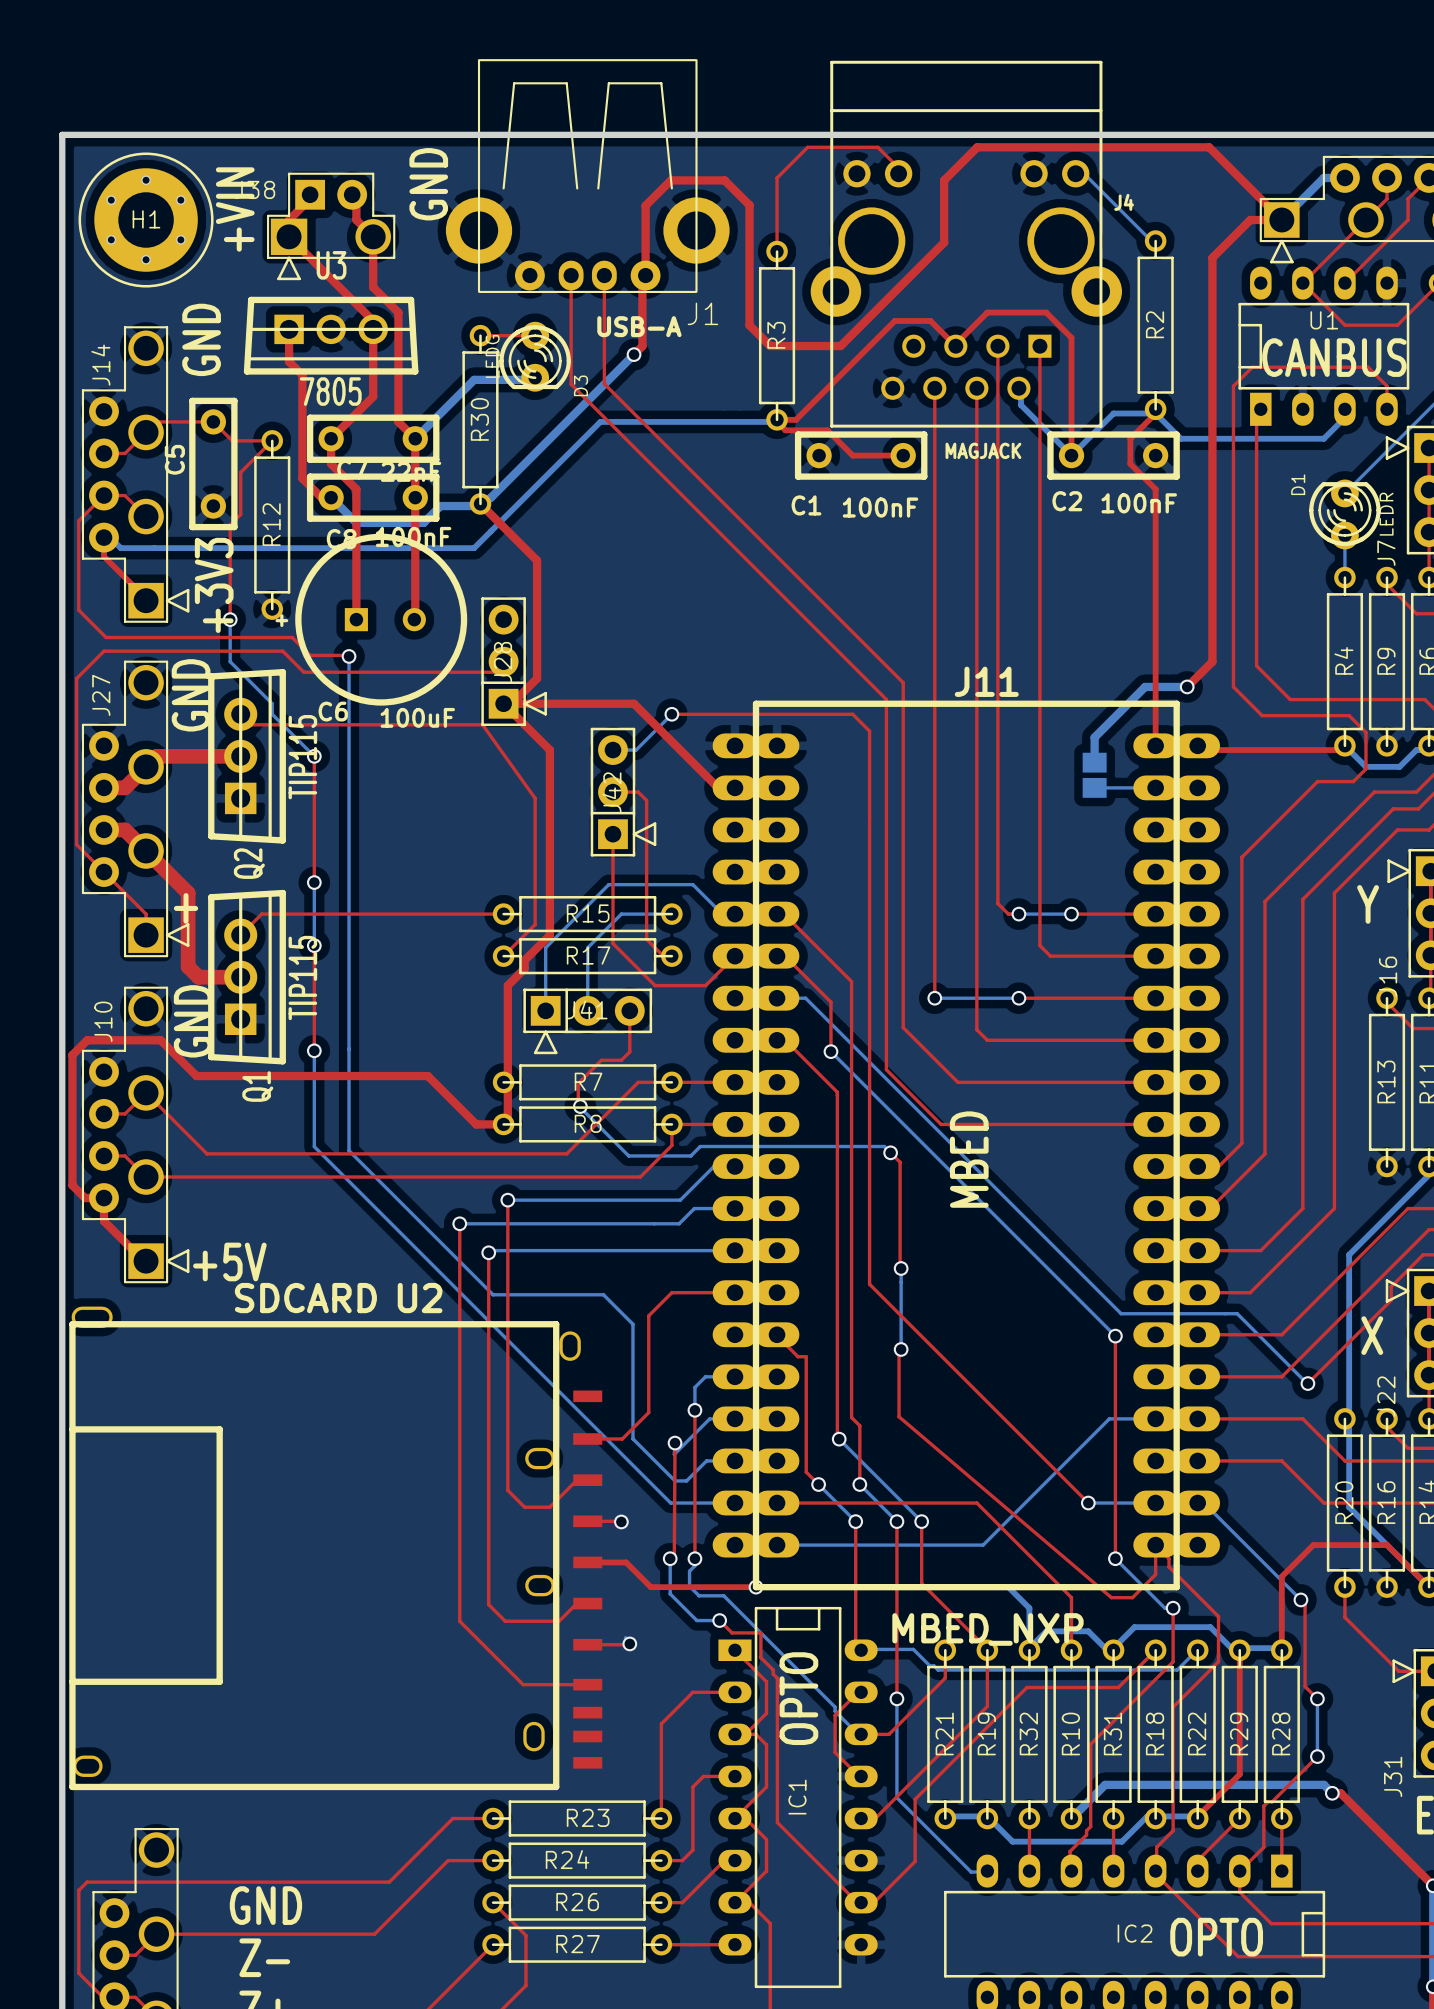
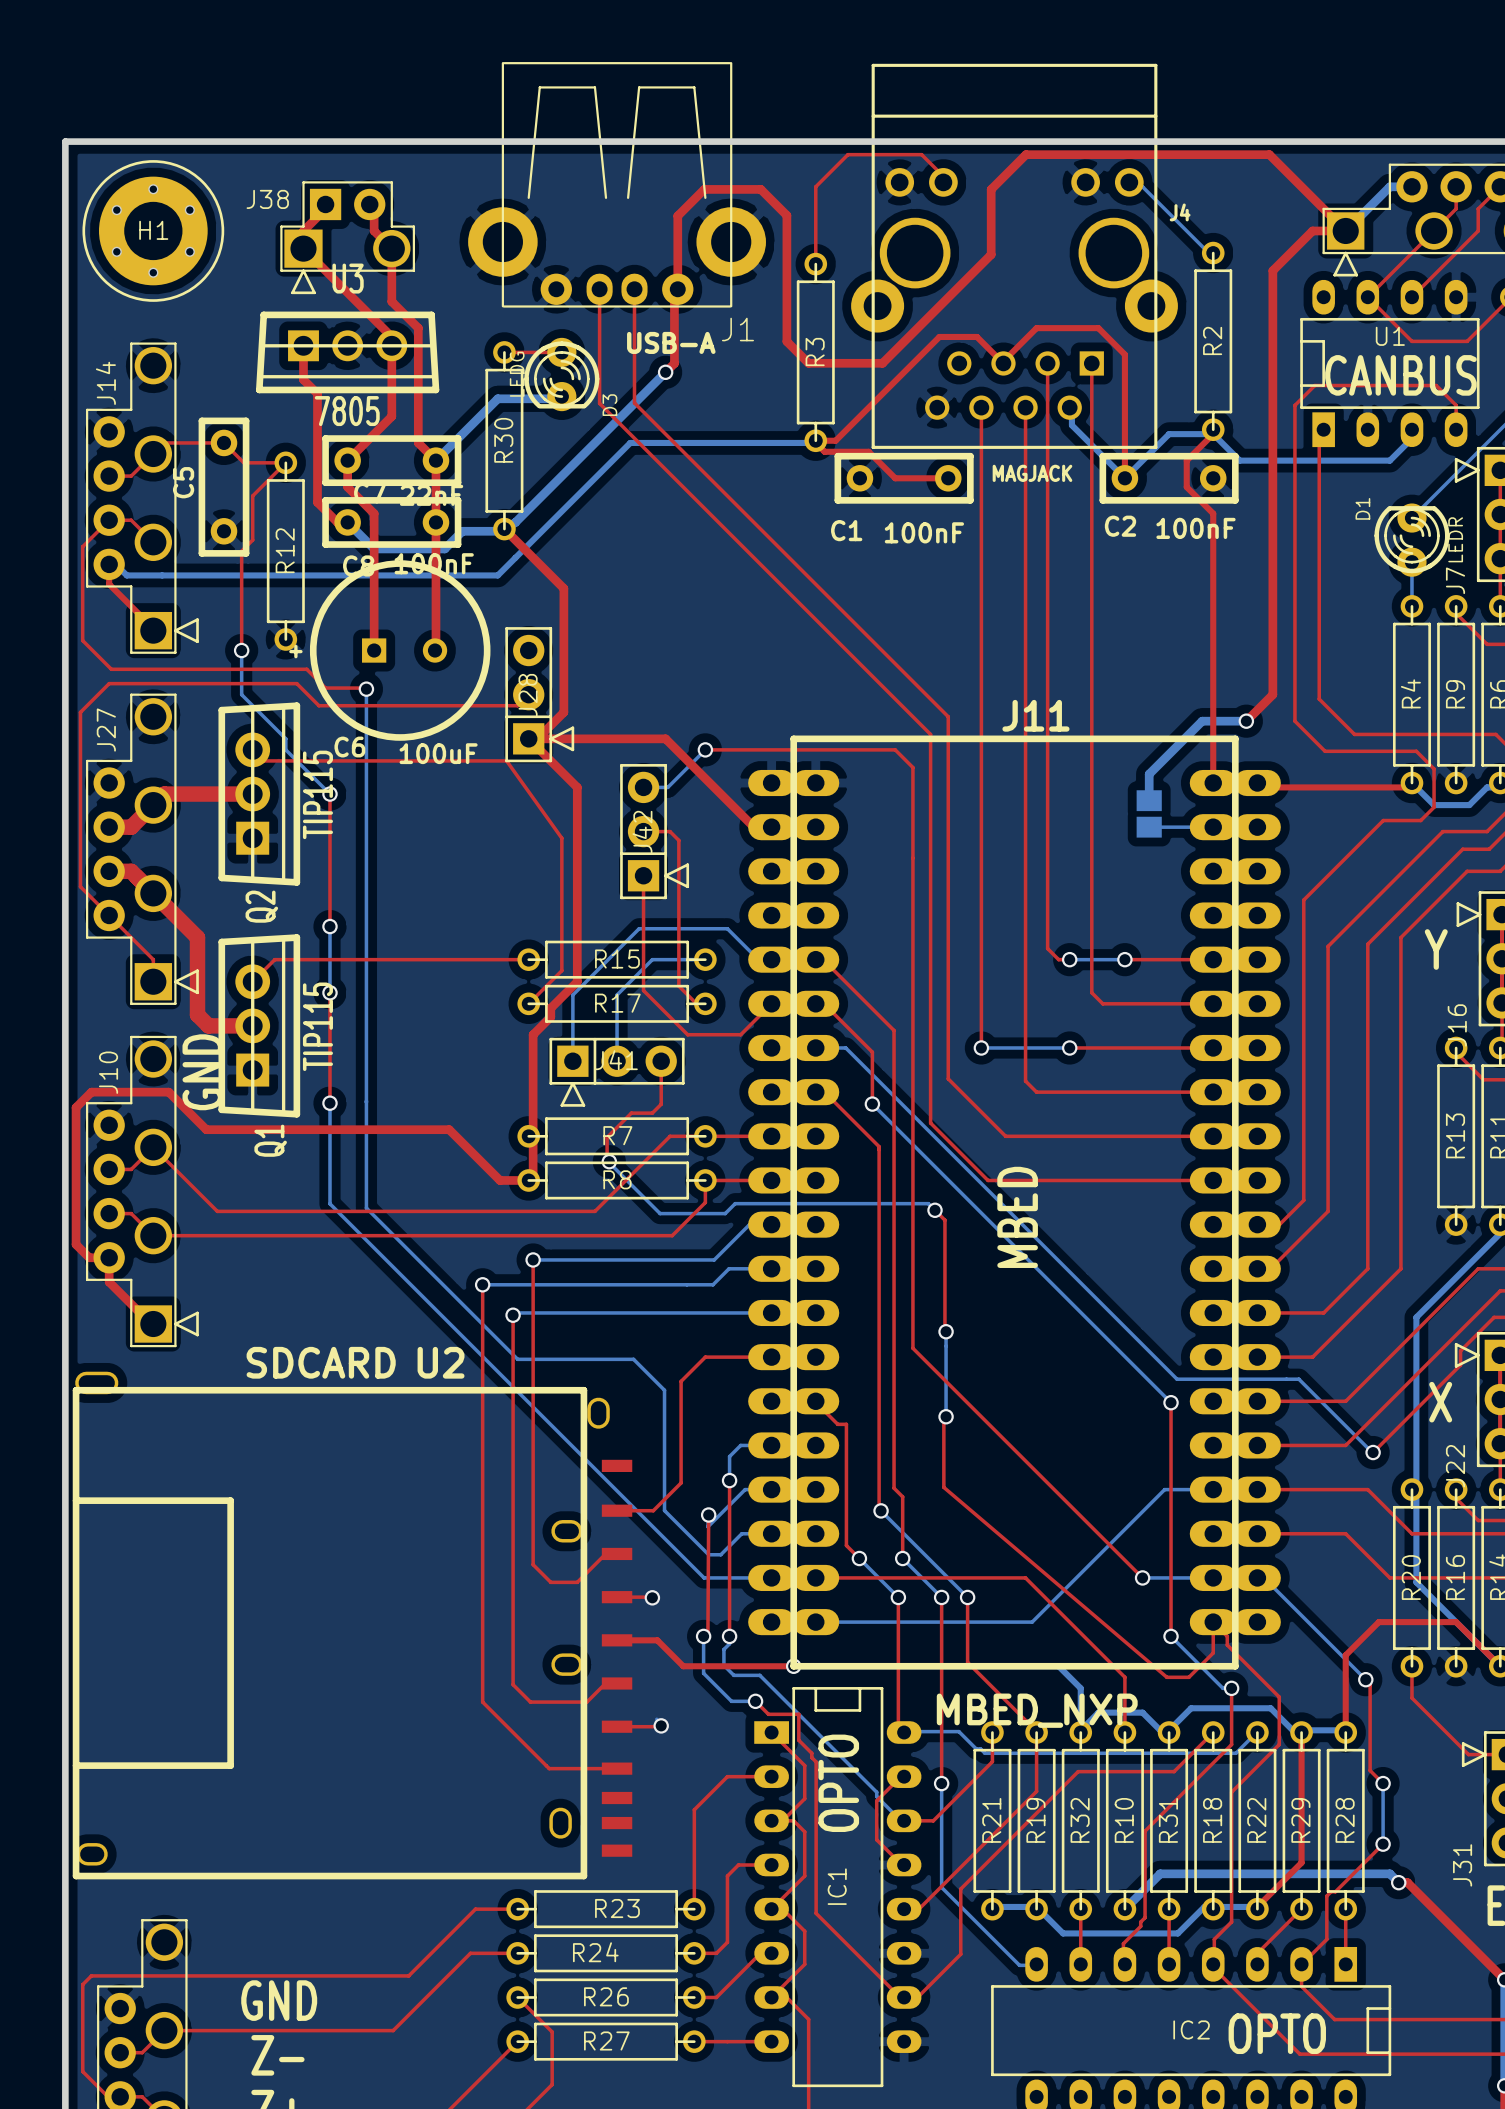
text: GND (428, 184) -> none
text: +VIN (235, 209) -> none
text: GND (201, 339) -> none
text: +3V3 (214, 585) -> none
text: GND (191, 695) -> none
text: + (186, 908) -> none
text: +5V (229, 1261) -> none

